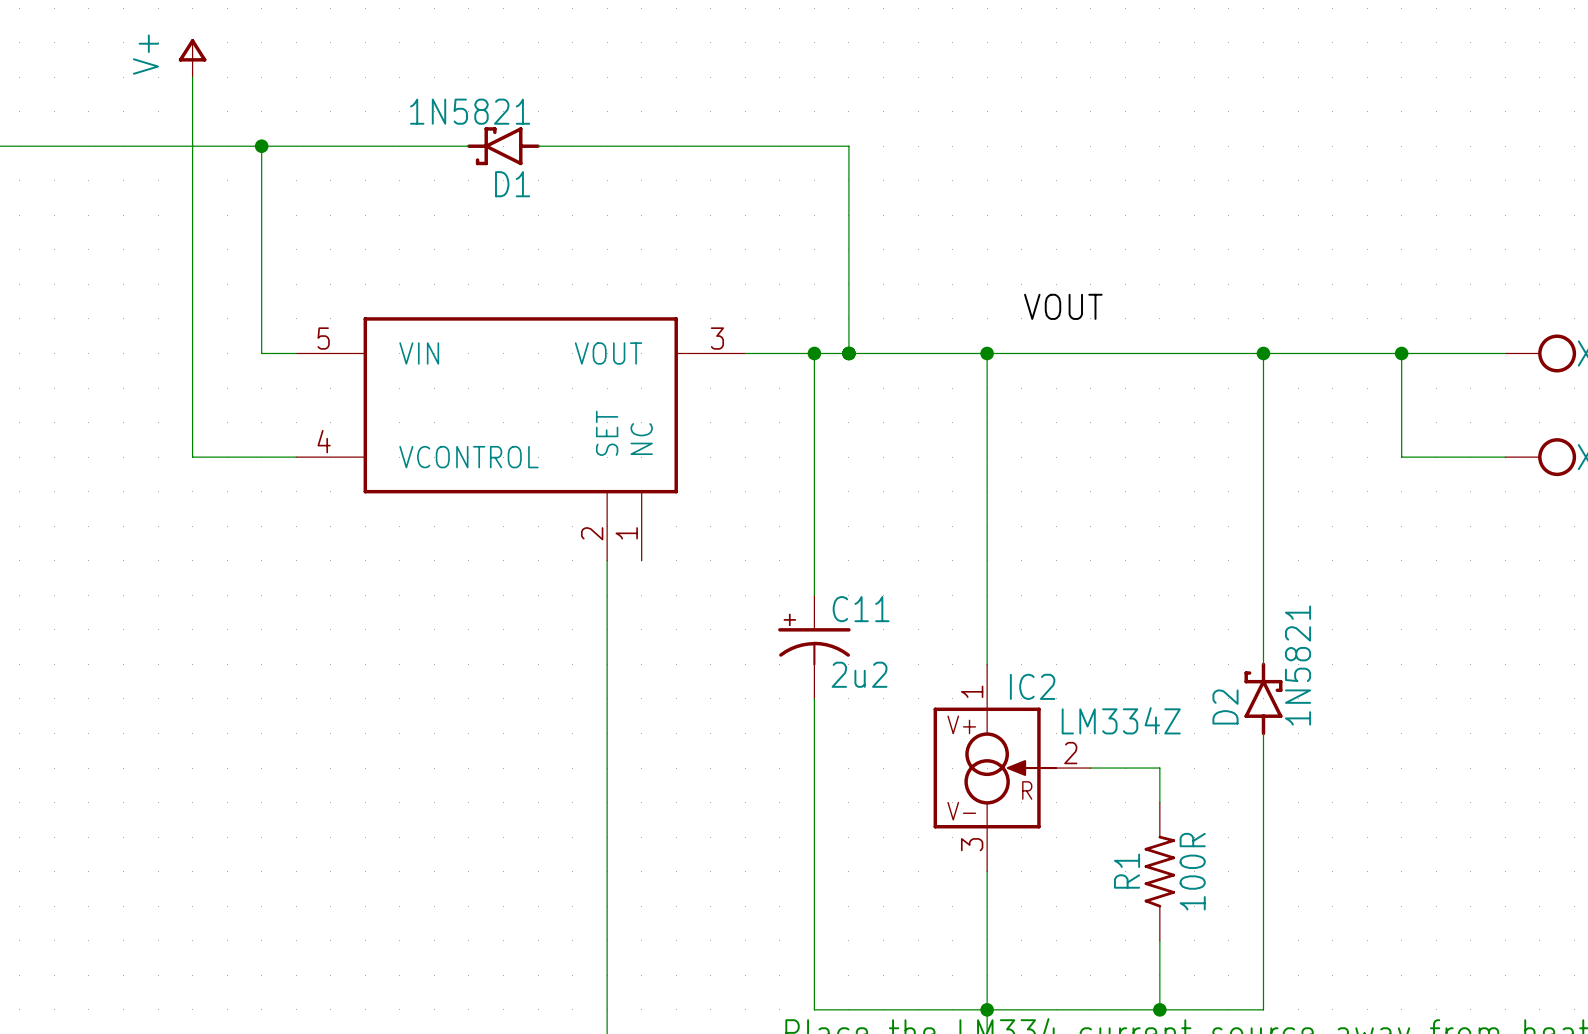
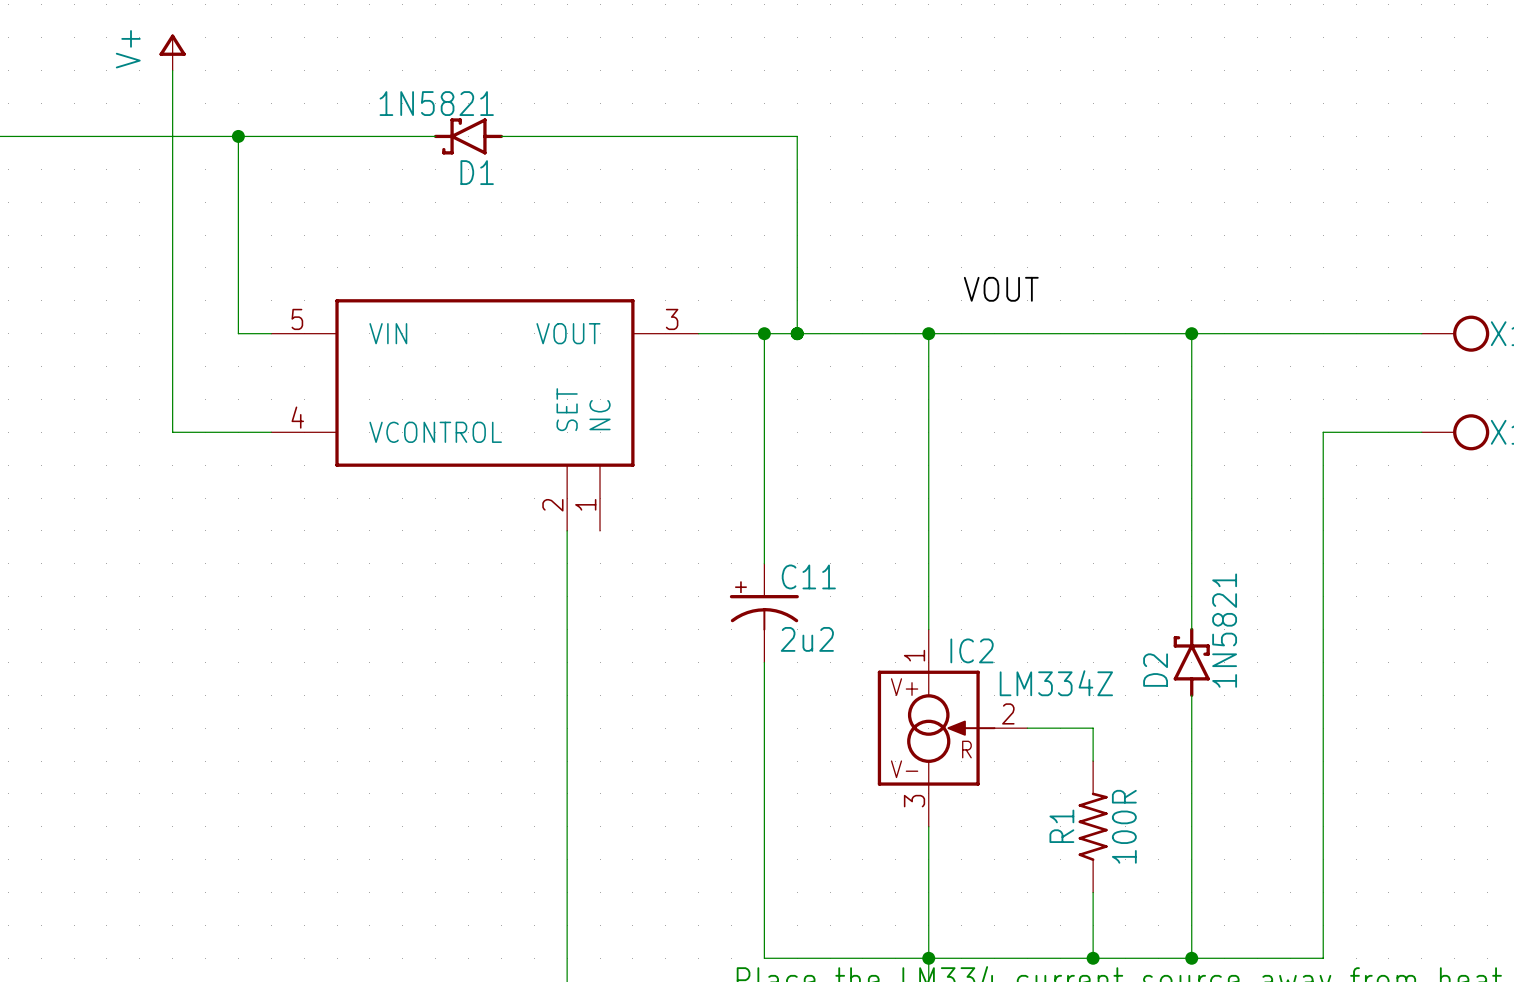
wire: (1401, 353) (1401, 457) -> (1191, 958) (1323, 958) (1323, 432)
junction: (1401, 353) -> none
junction: none -> (1191, 958)

